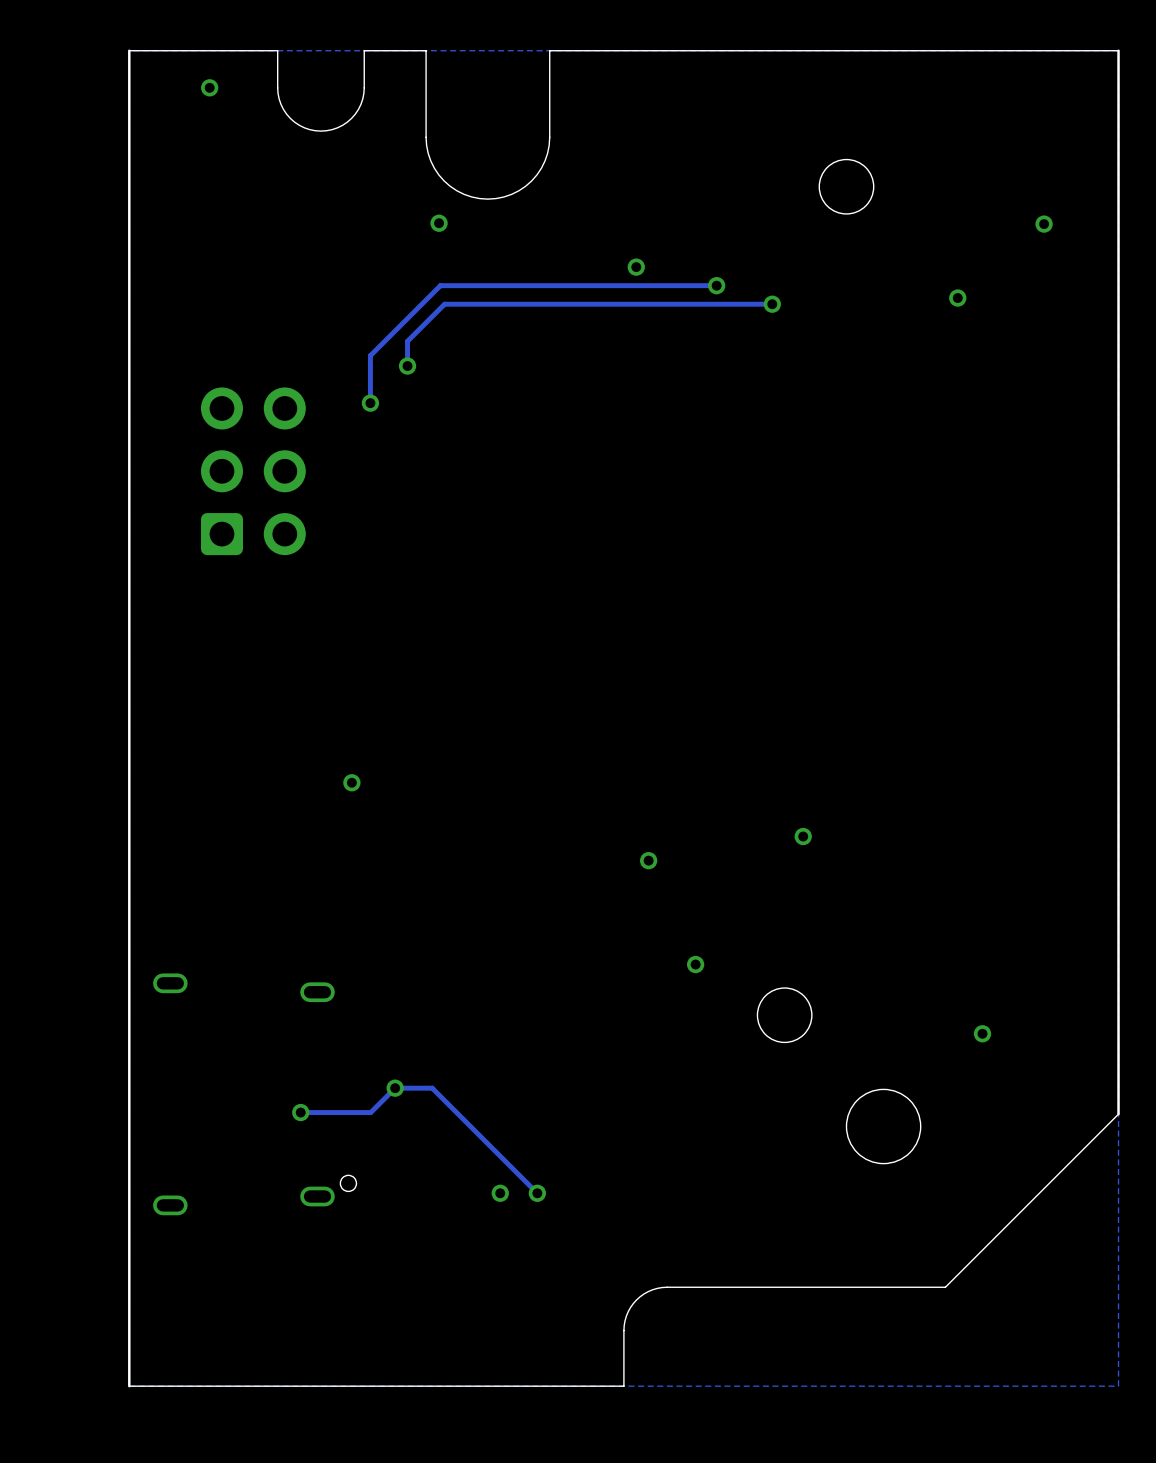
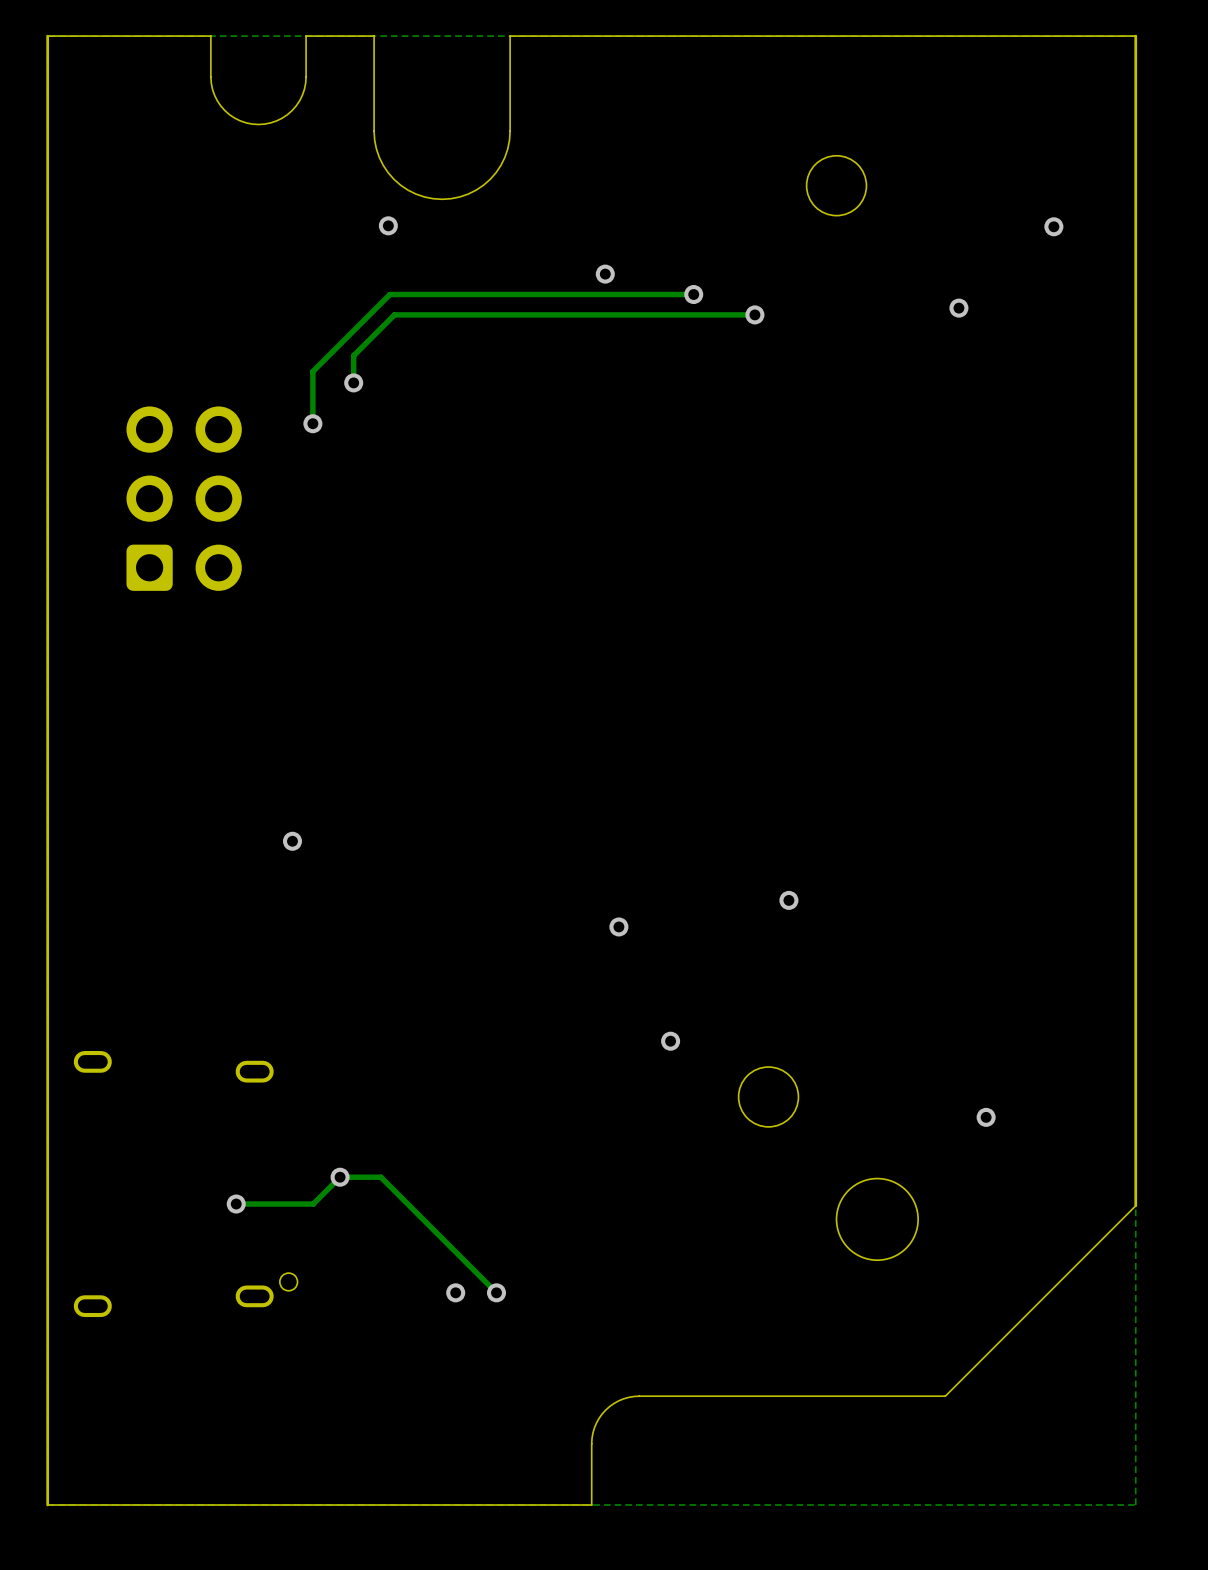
via: (209, 87) -> none

